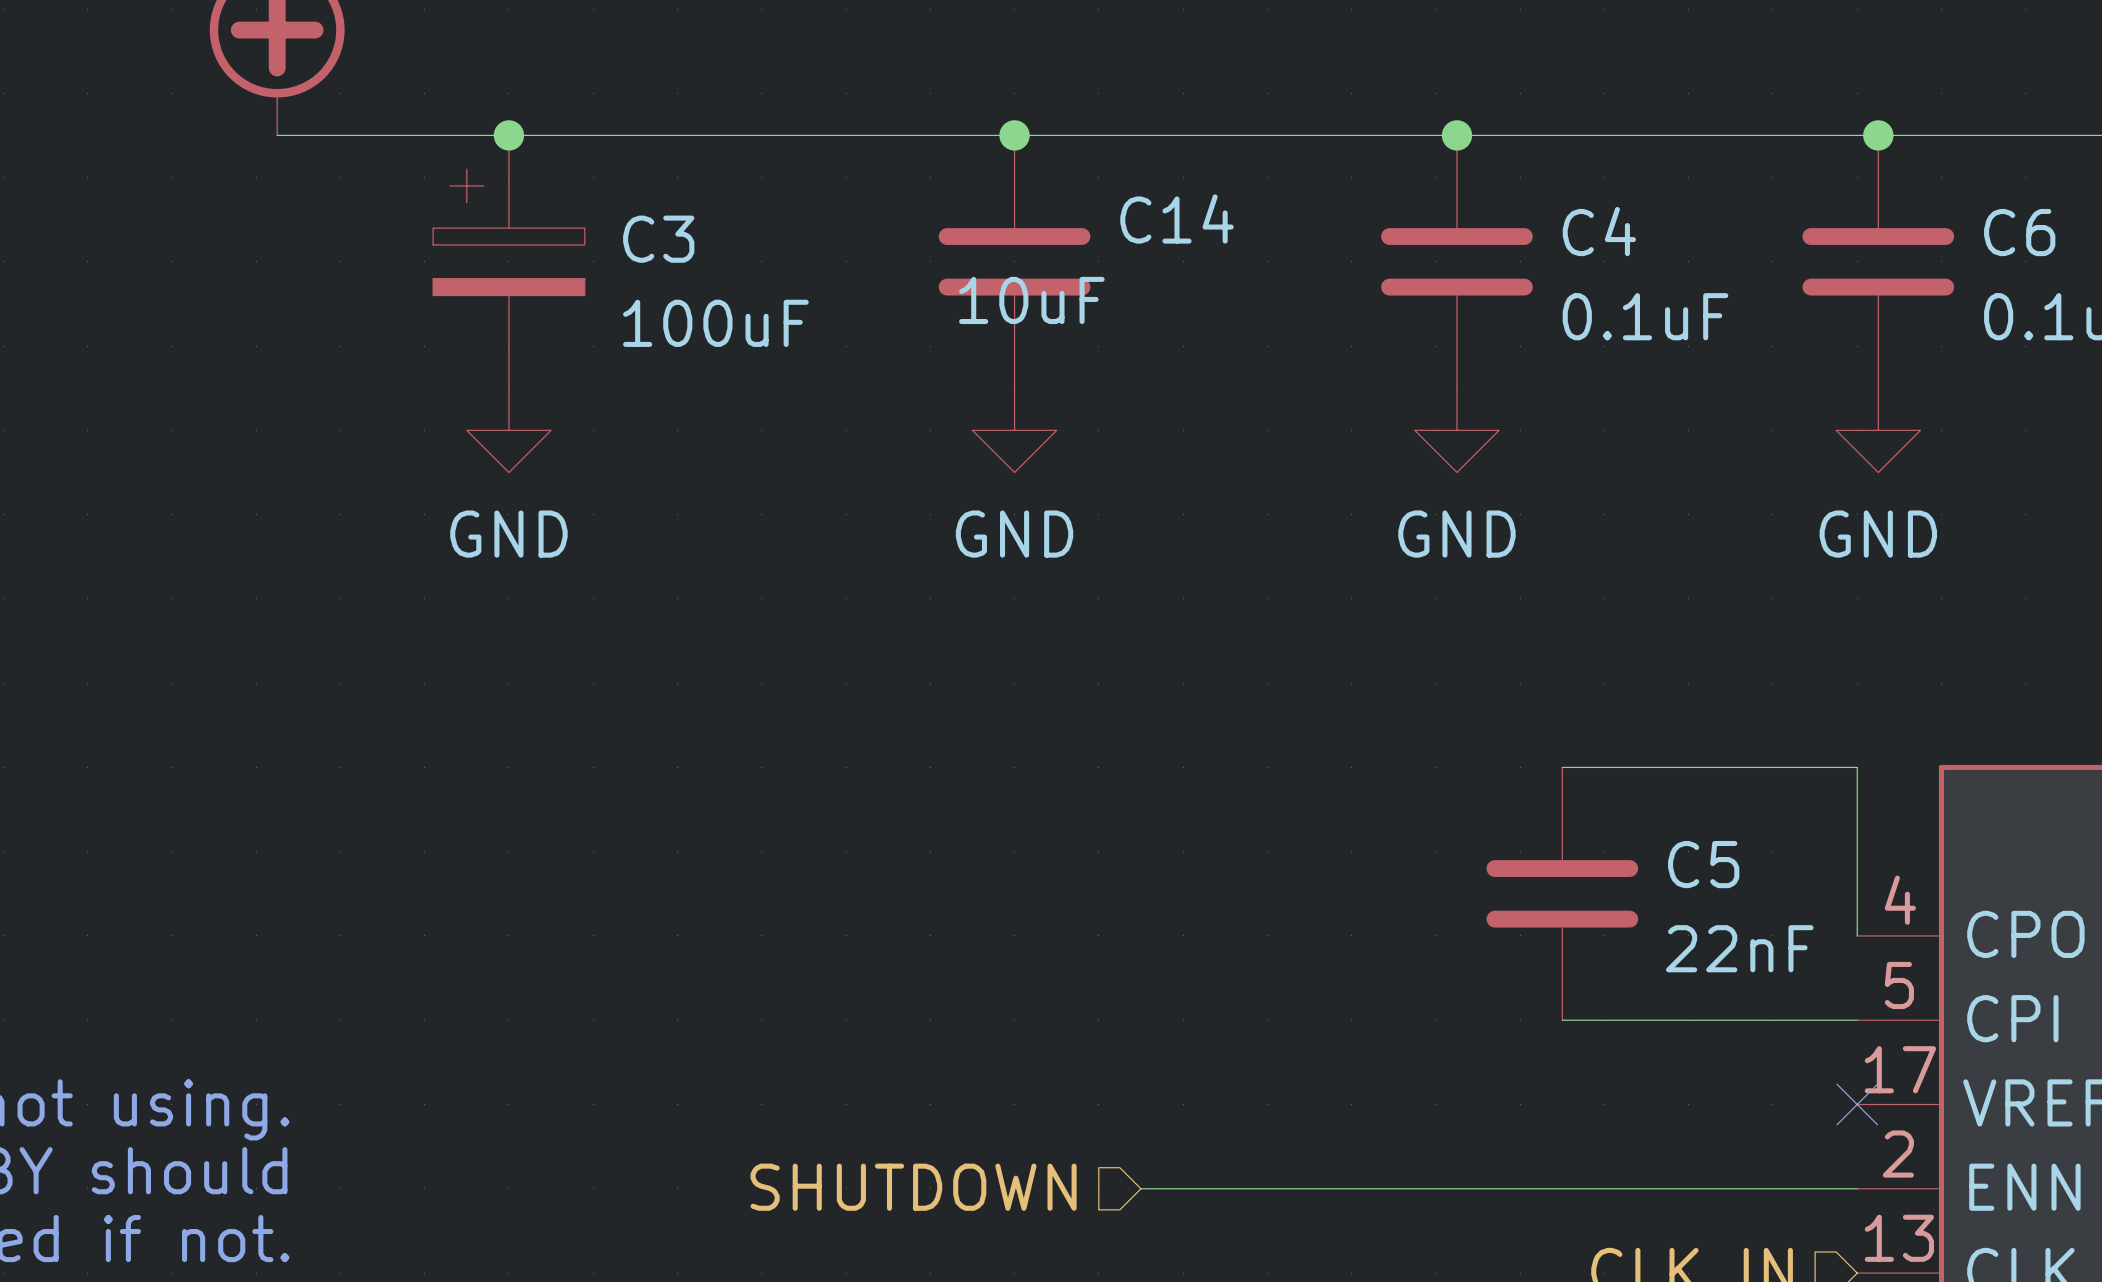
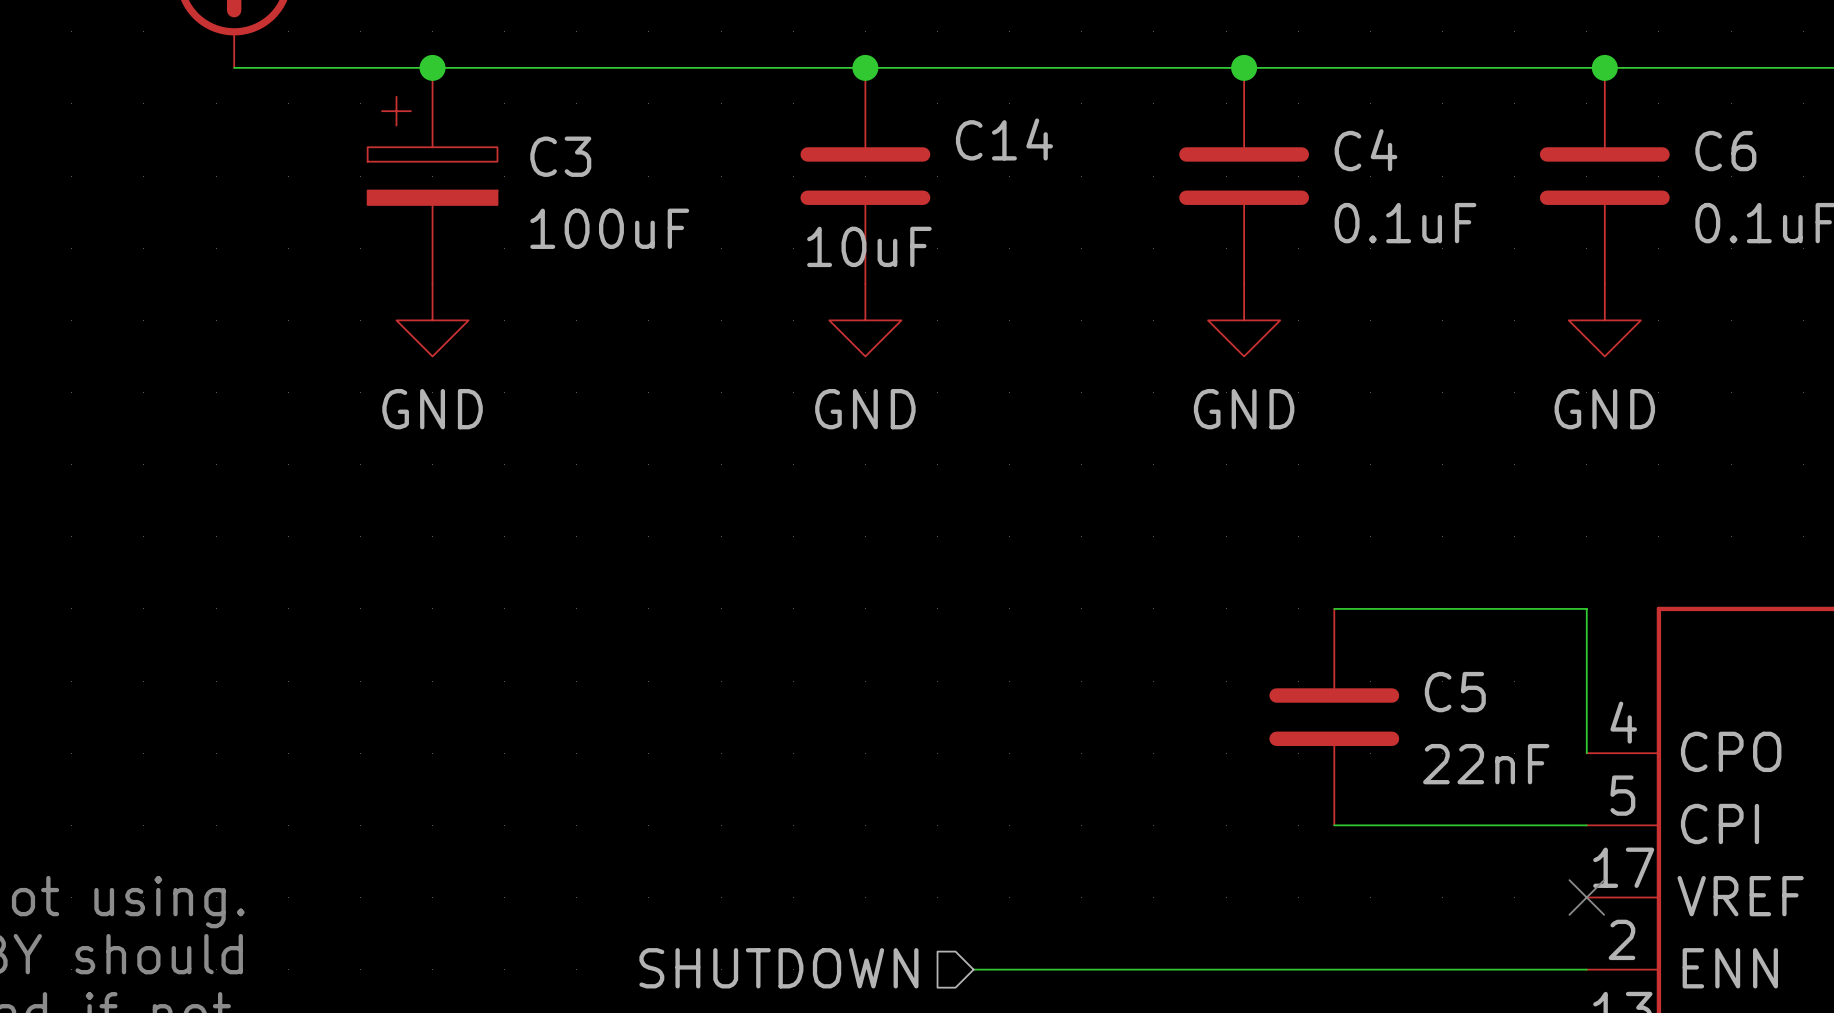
C14 value position: 10uF (1031, 300) -> 10uF (869, 246)

